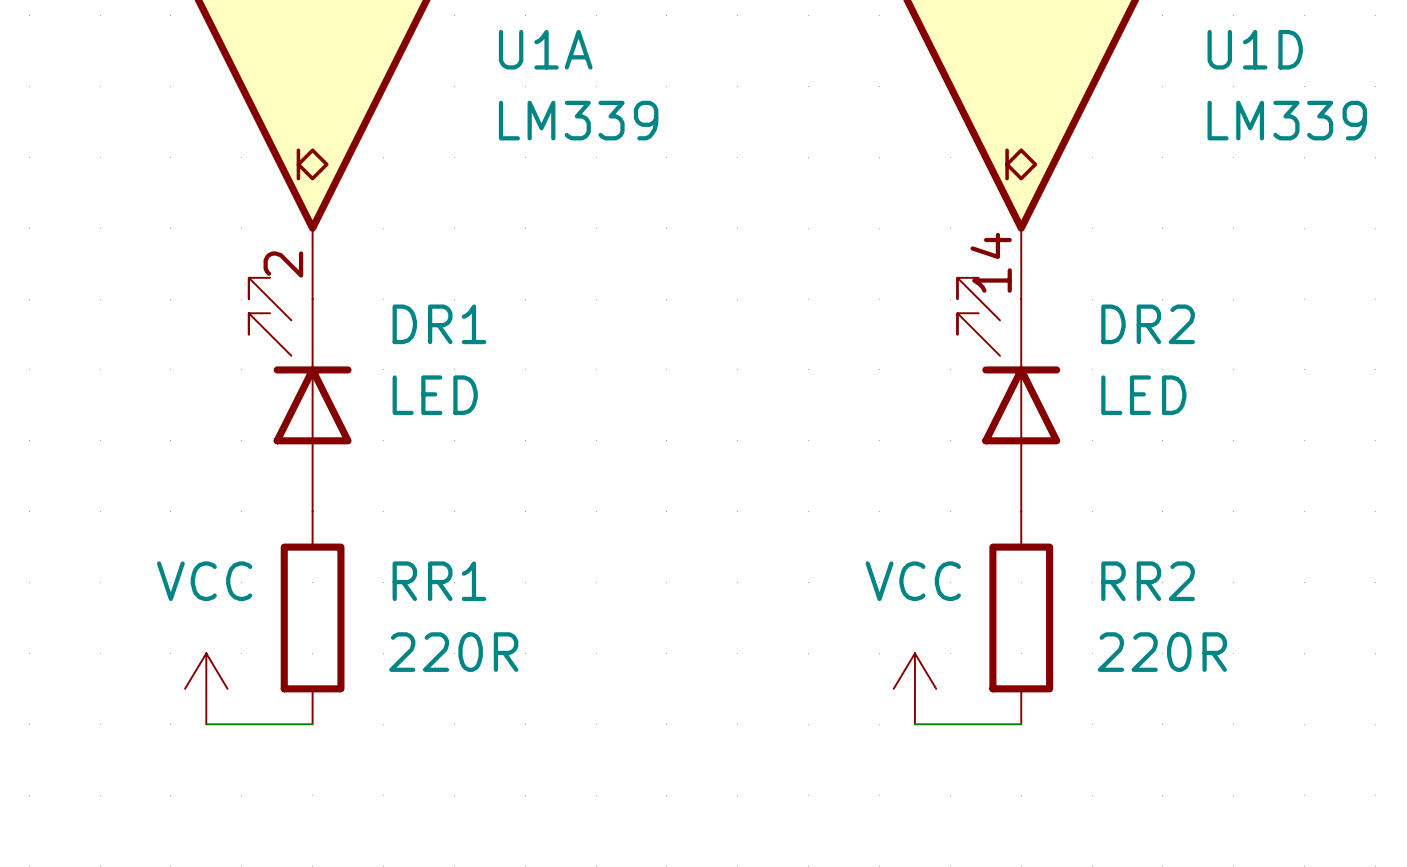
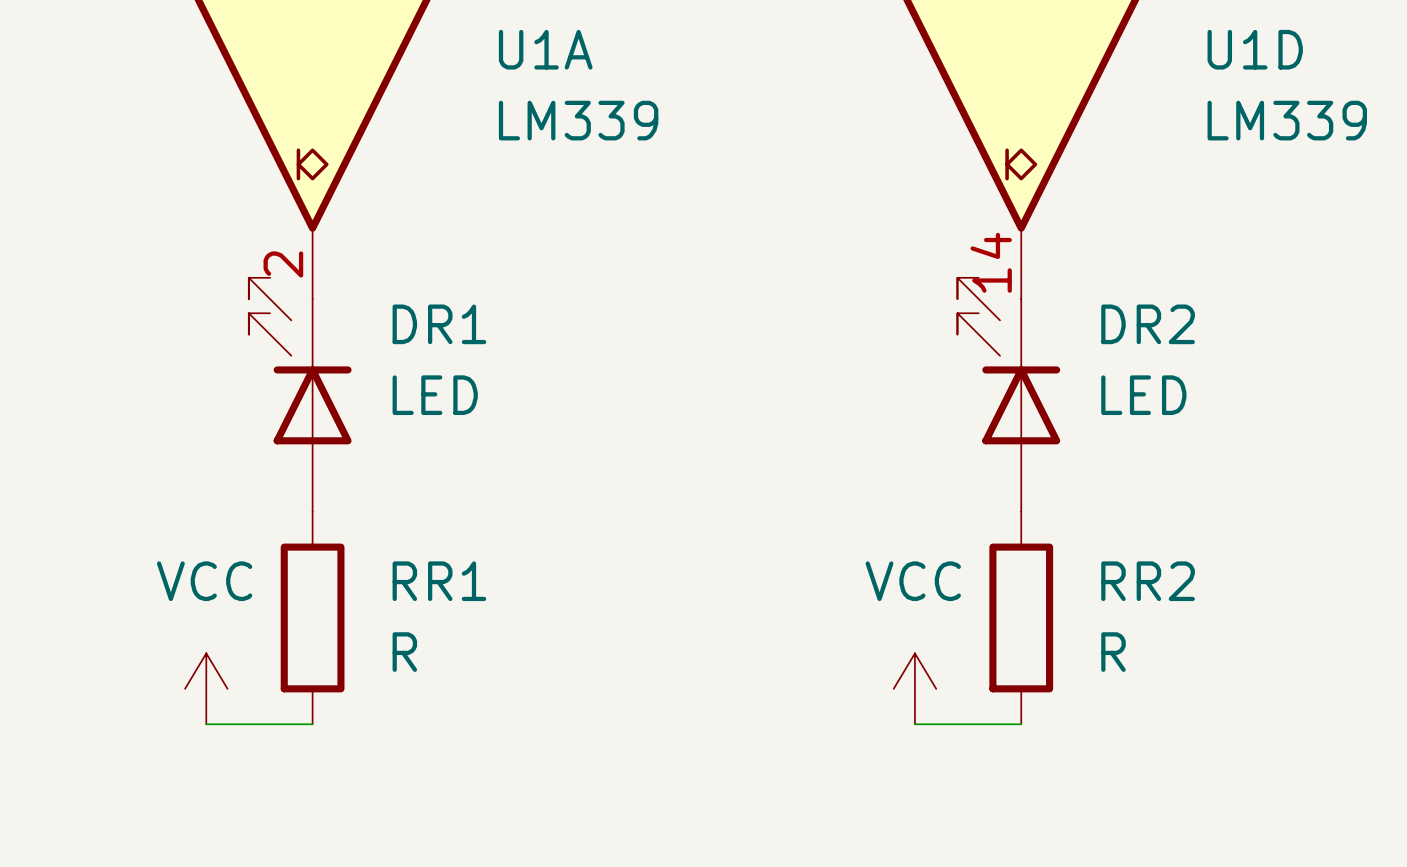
RR1 value: 220R (453, 652) -> R (404, 652)
RR2 value: 220R (1162, 652) -> R (1113, 652)

